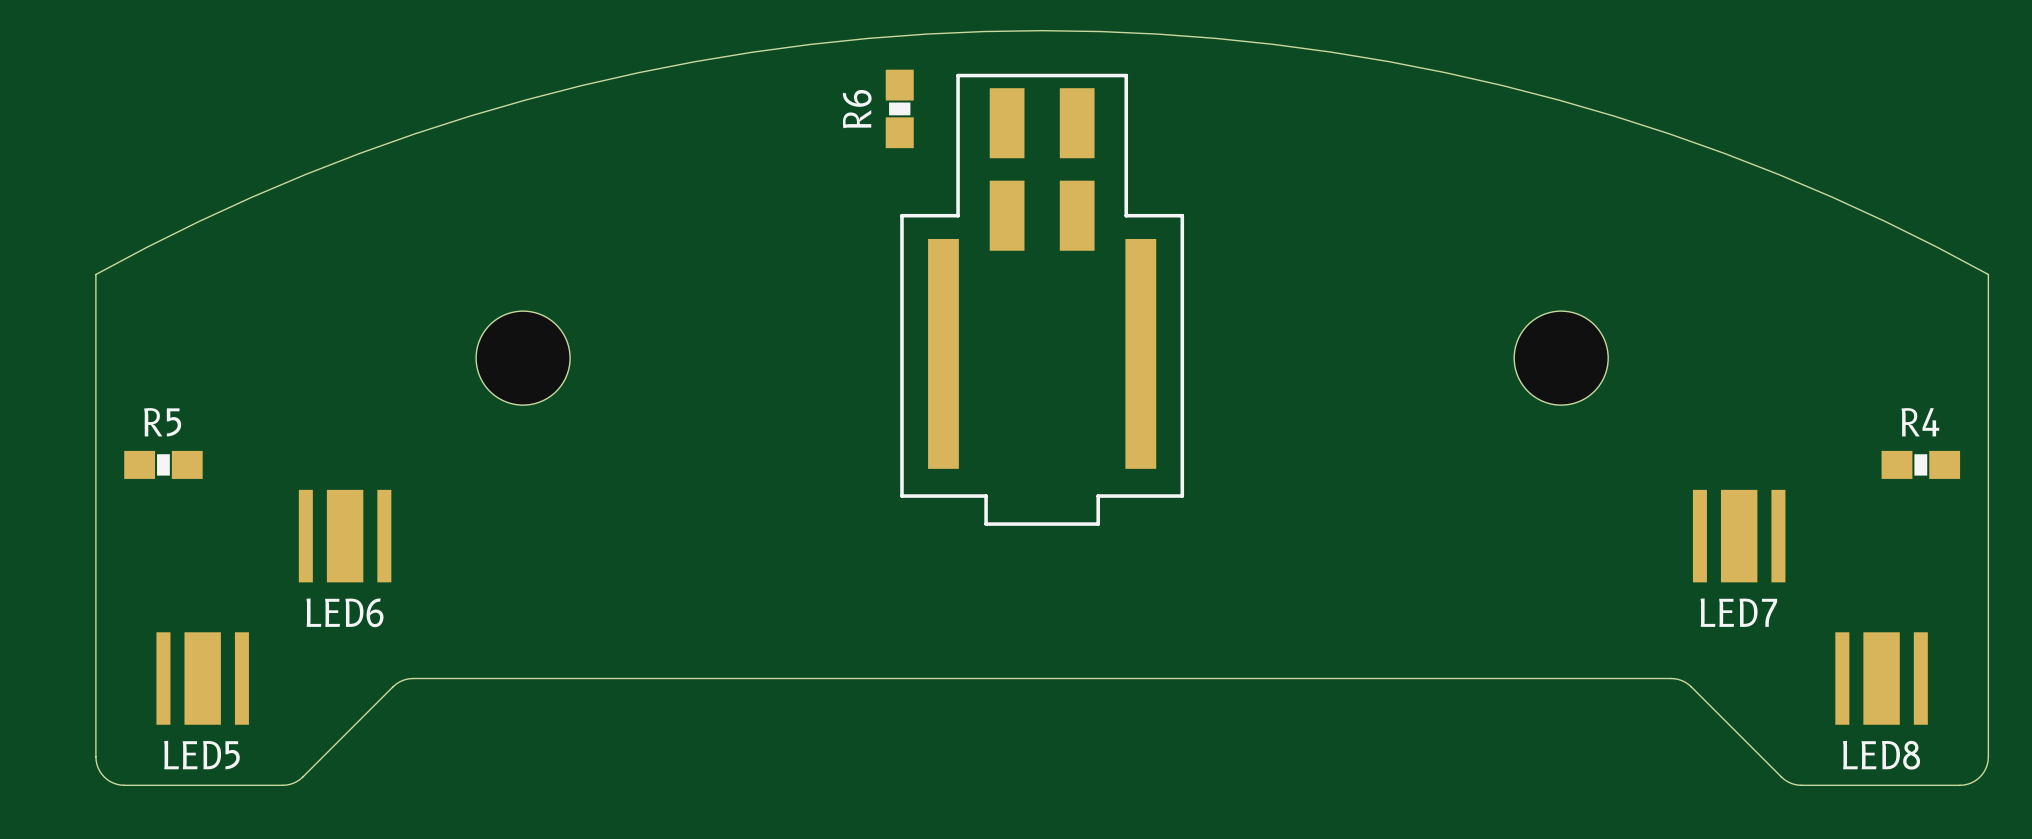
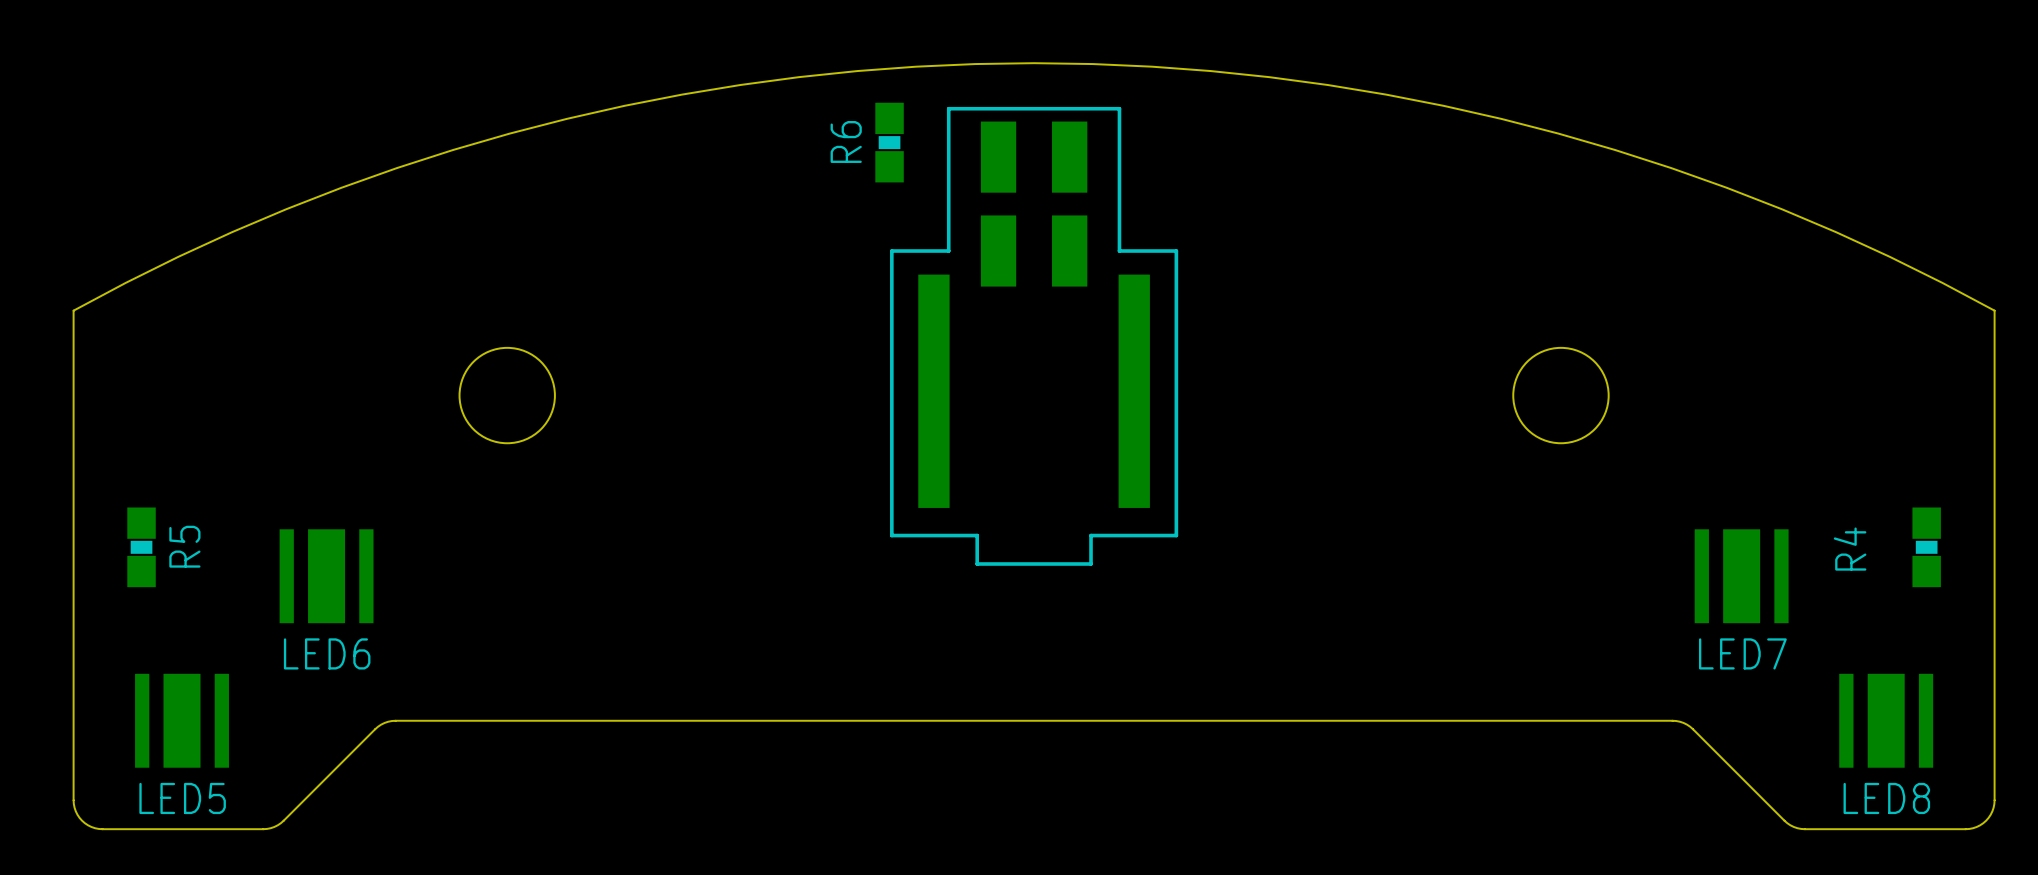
R4 position: (1920, 422) -> (1850, 549)
R4 name rotation: 0° (1920, 422) -> 90° counterclockwise (1850, 549)
R5 rotation: 0° (163, 464) -> 90° clockwise (141, 547)
part rotation: 0° (1920, 464) -> 90° clockwise (1926, 547)

